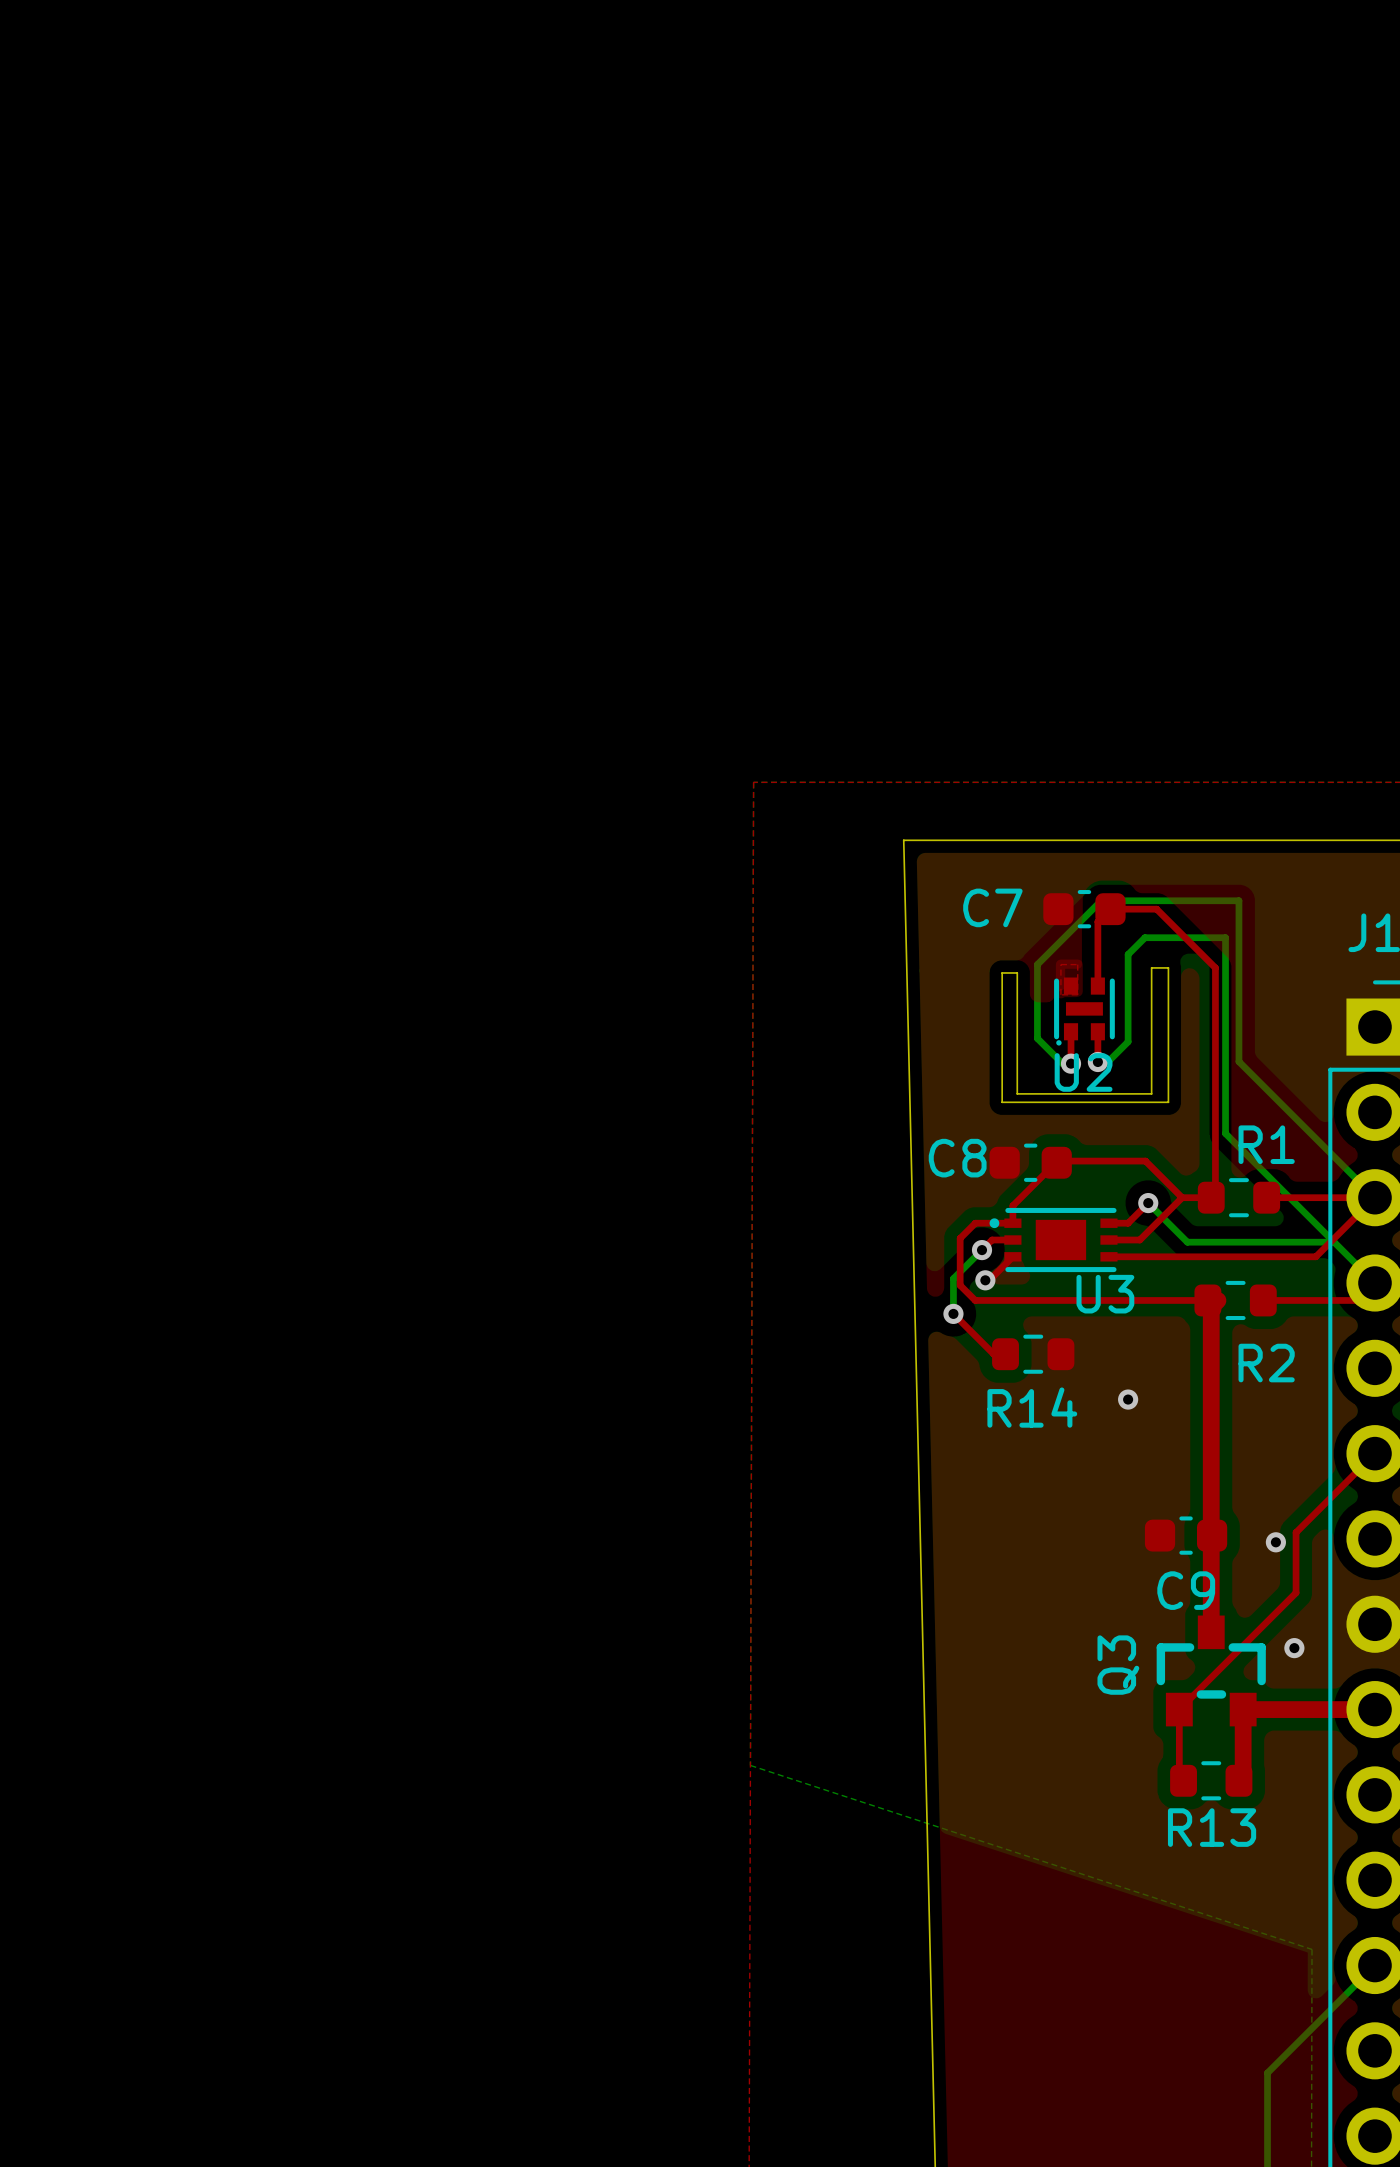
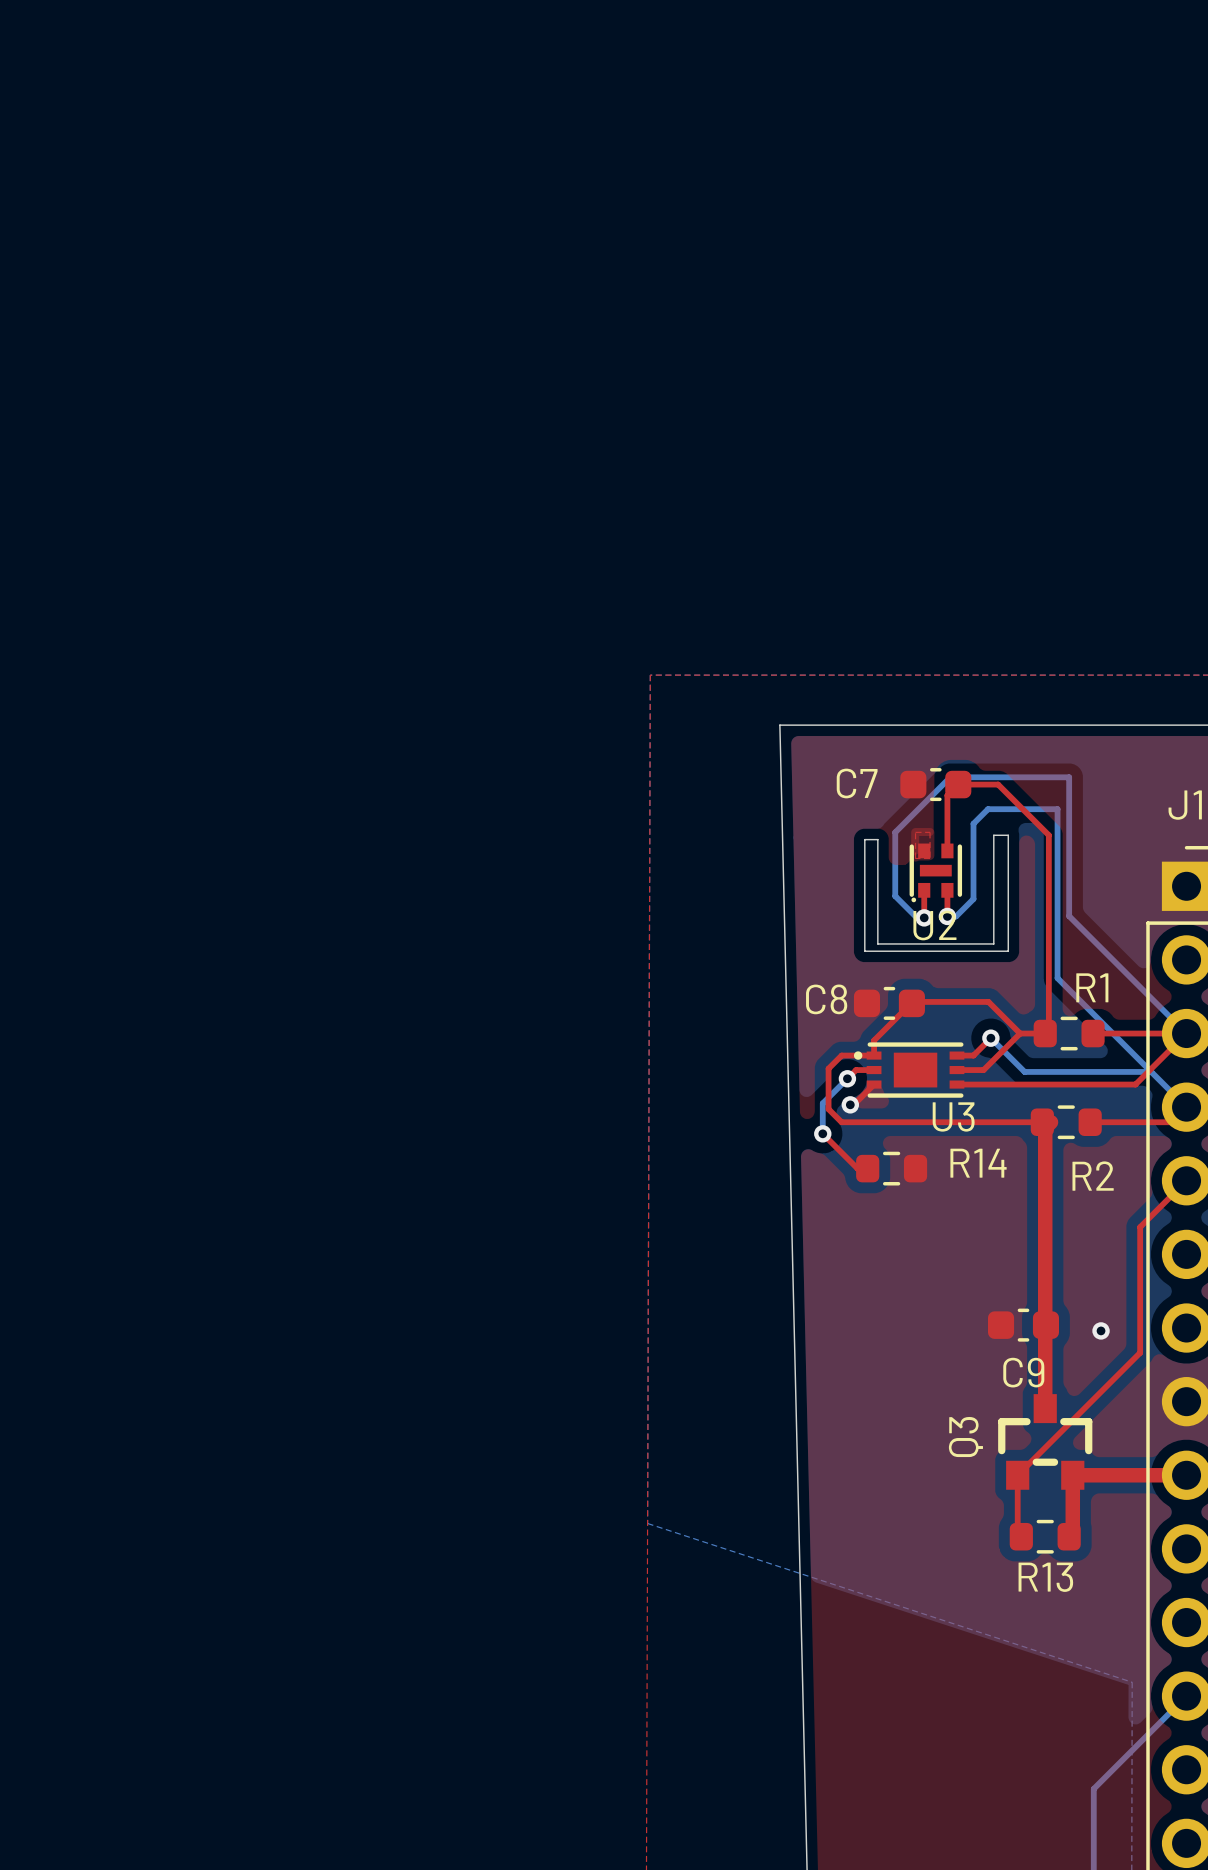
via: (1128, 1399) -> none
R14 name position: R14 (1032, 1407) -> R14 (978, 1163)
top track: (1374, 1453) (1296, 1532) (1296, 1592) -> (1186, 1180) (1140, 1227) (1140, 1352) (1118, 1374)
via: (1294, 1648) -> none

